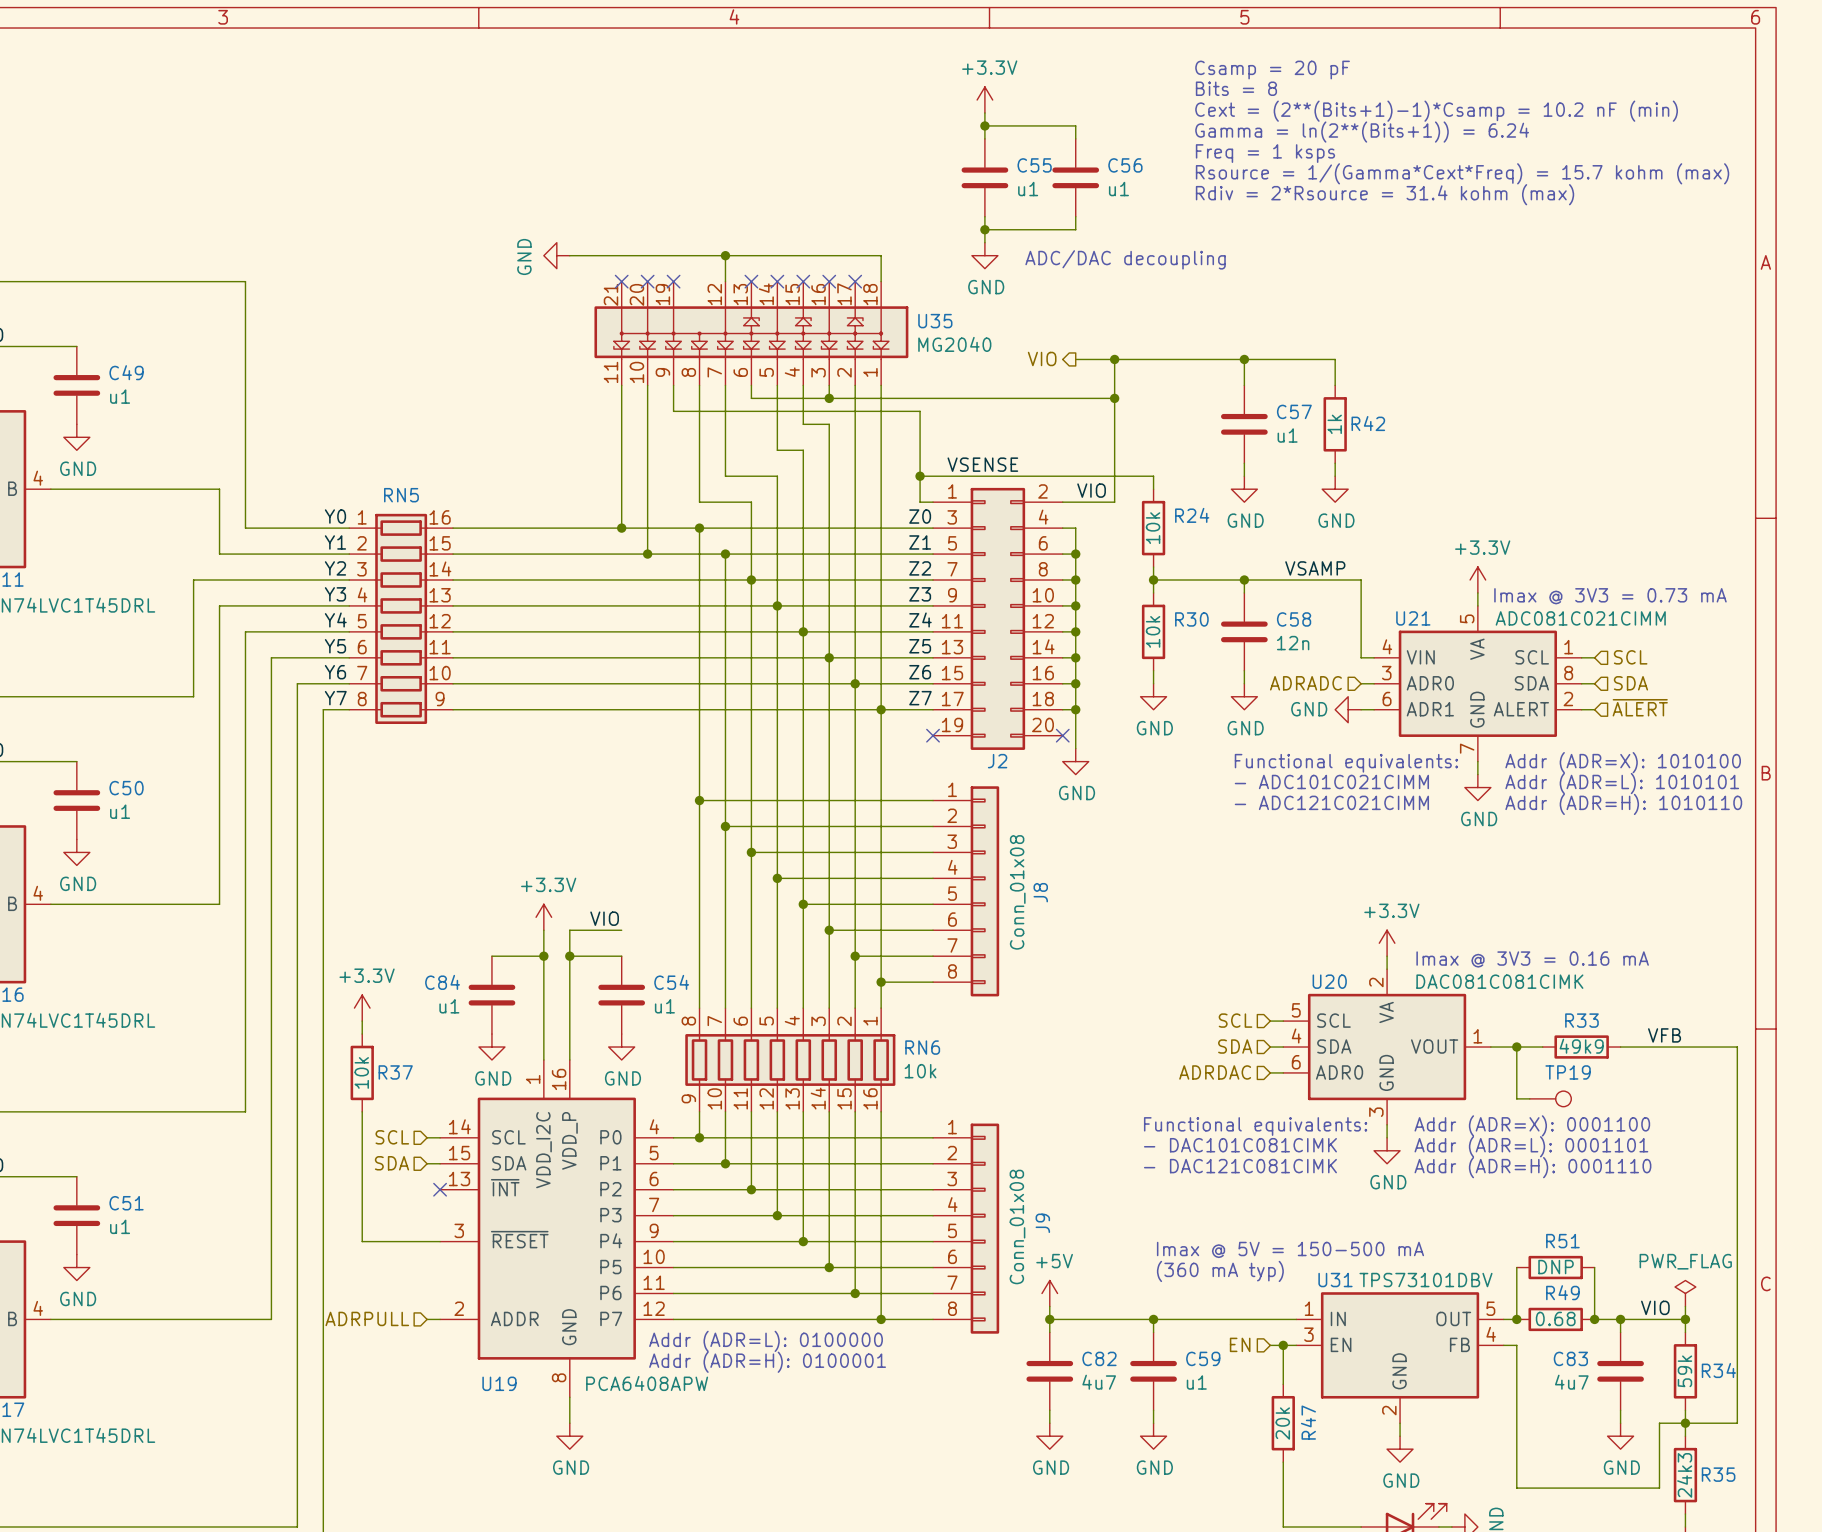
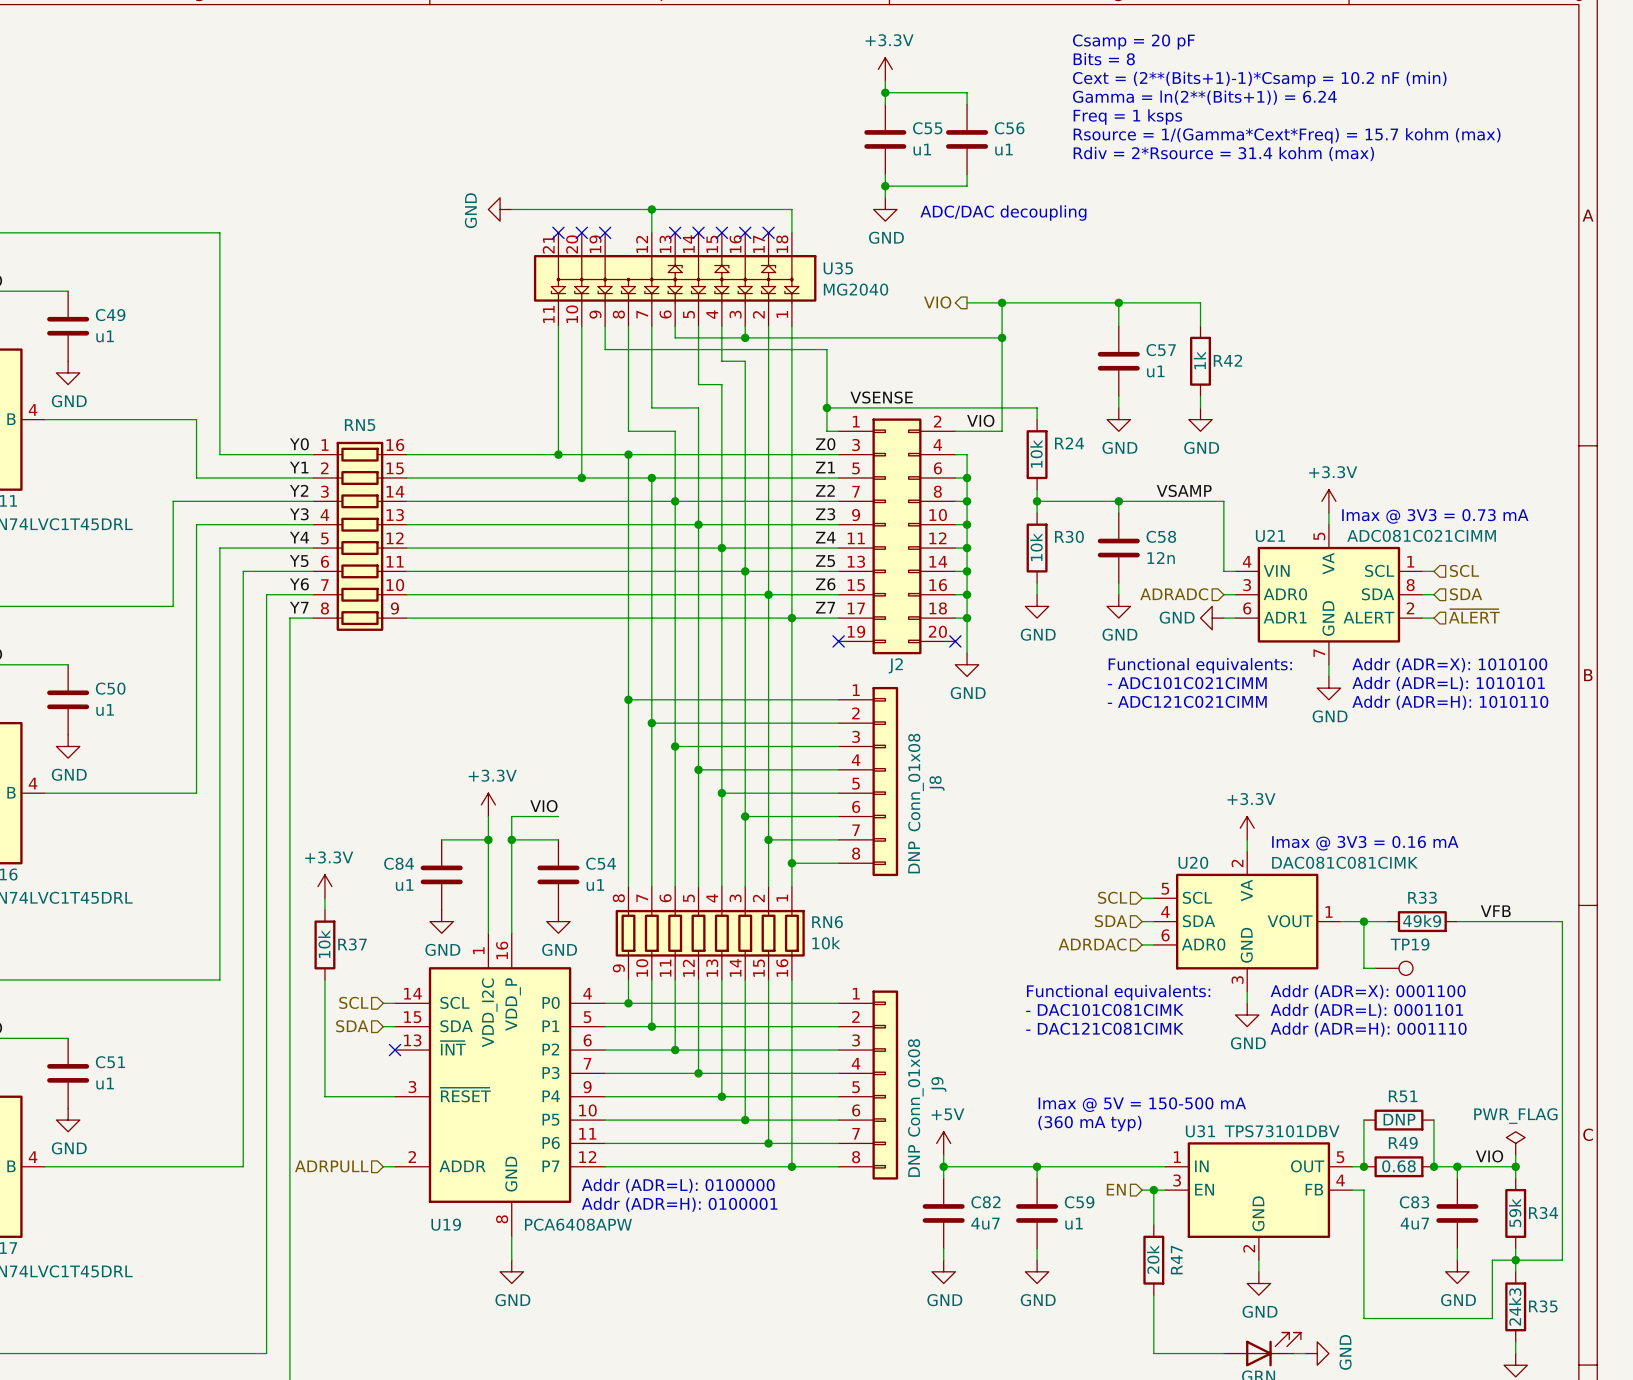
J8 text: none -> DNP (914, 857)
J9 text: none -> DNP (914, 1160)

